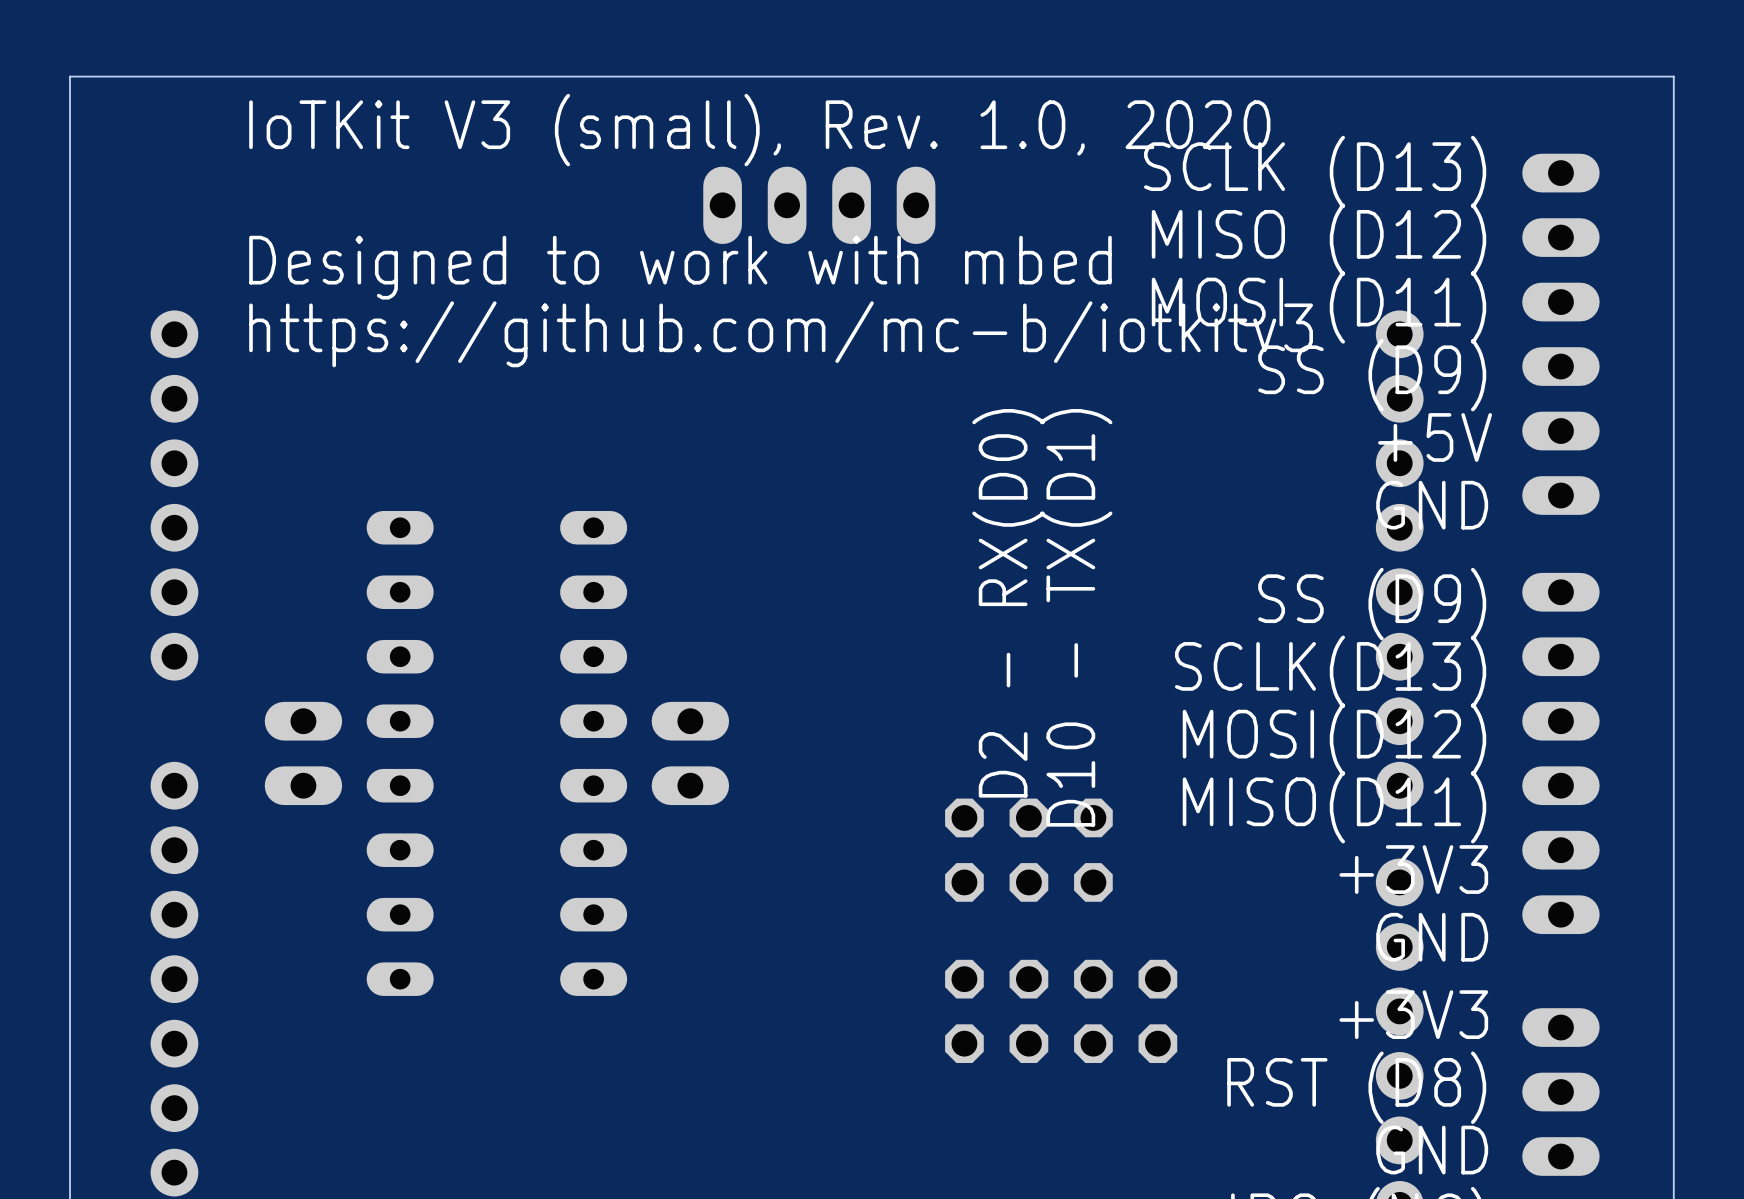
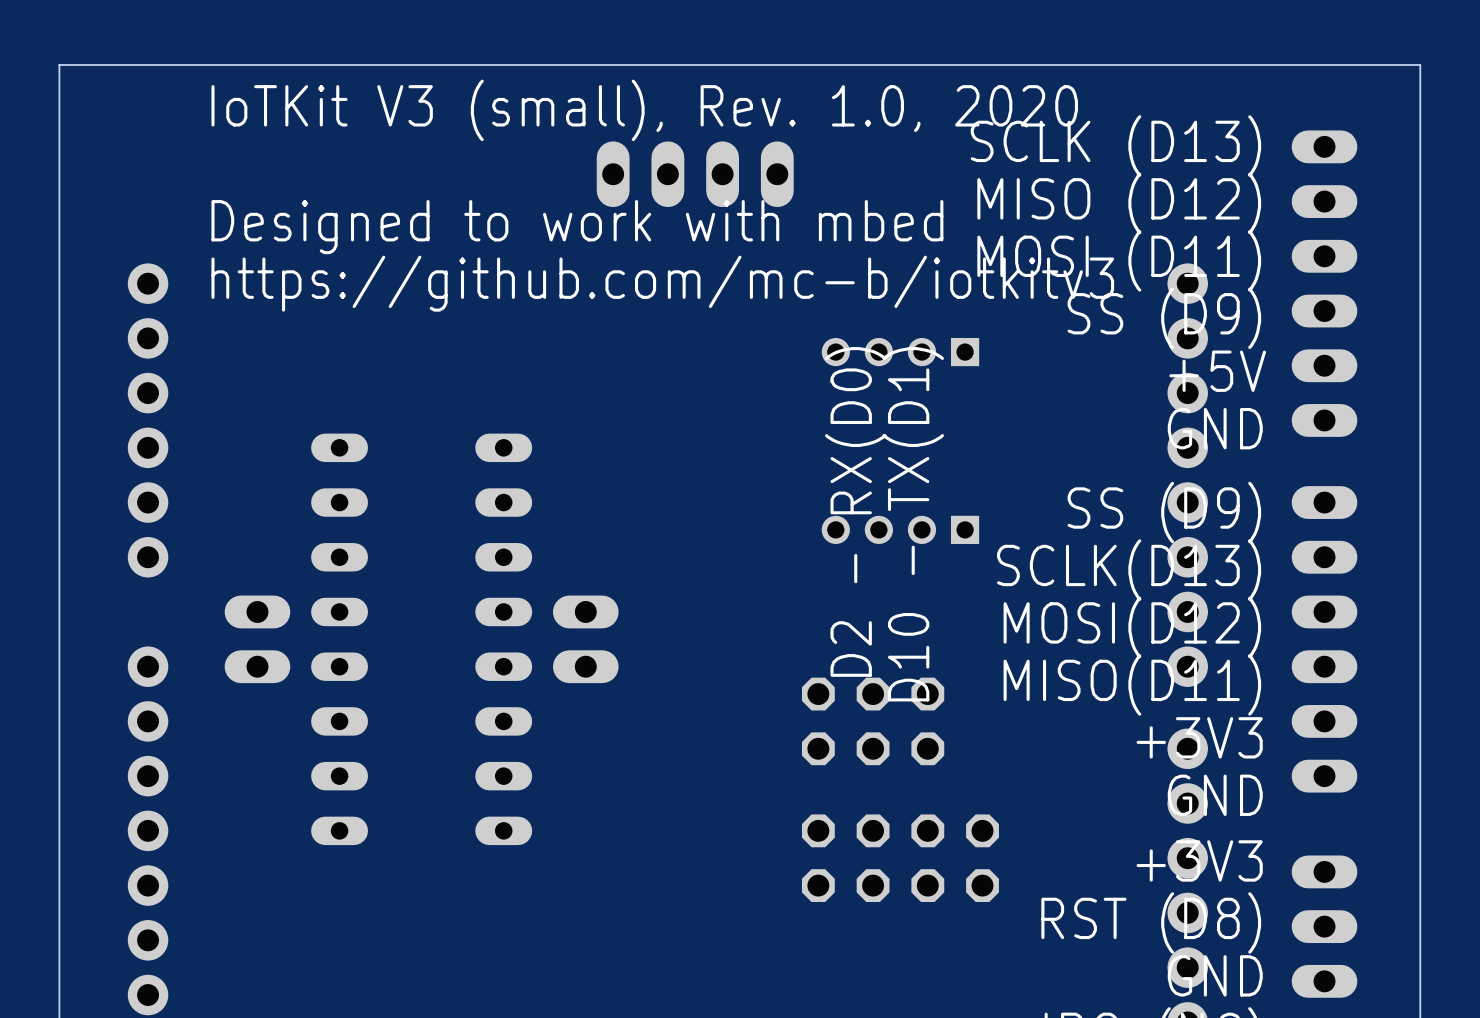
part: none -> (900, 352)
part: none -> (900, 529)

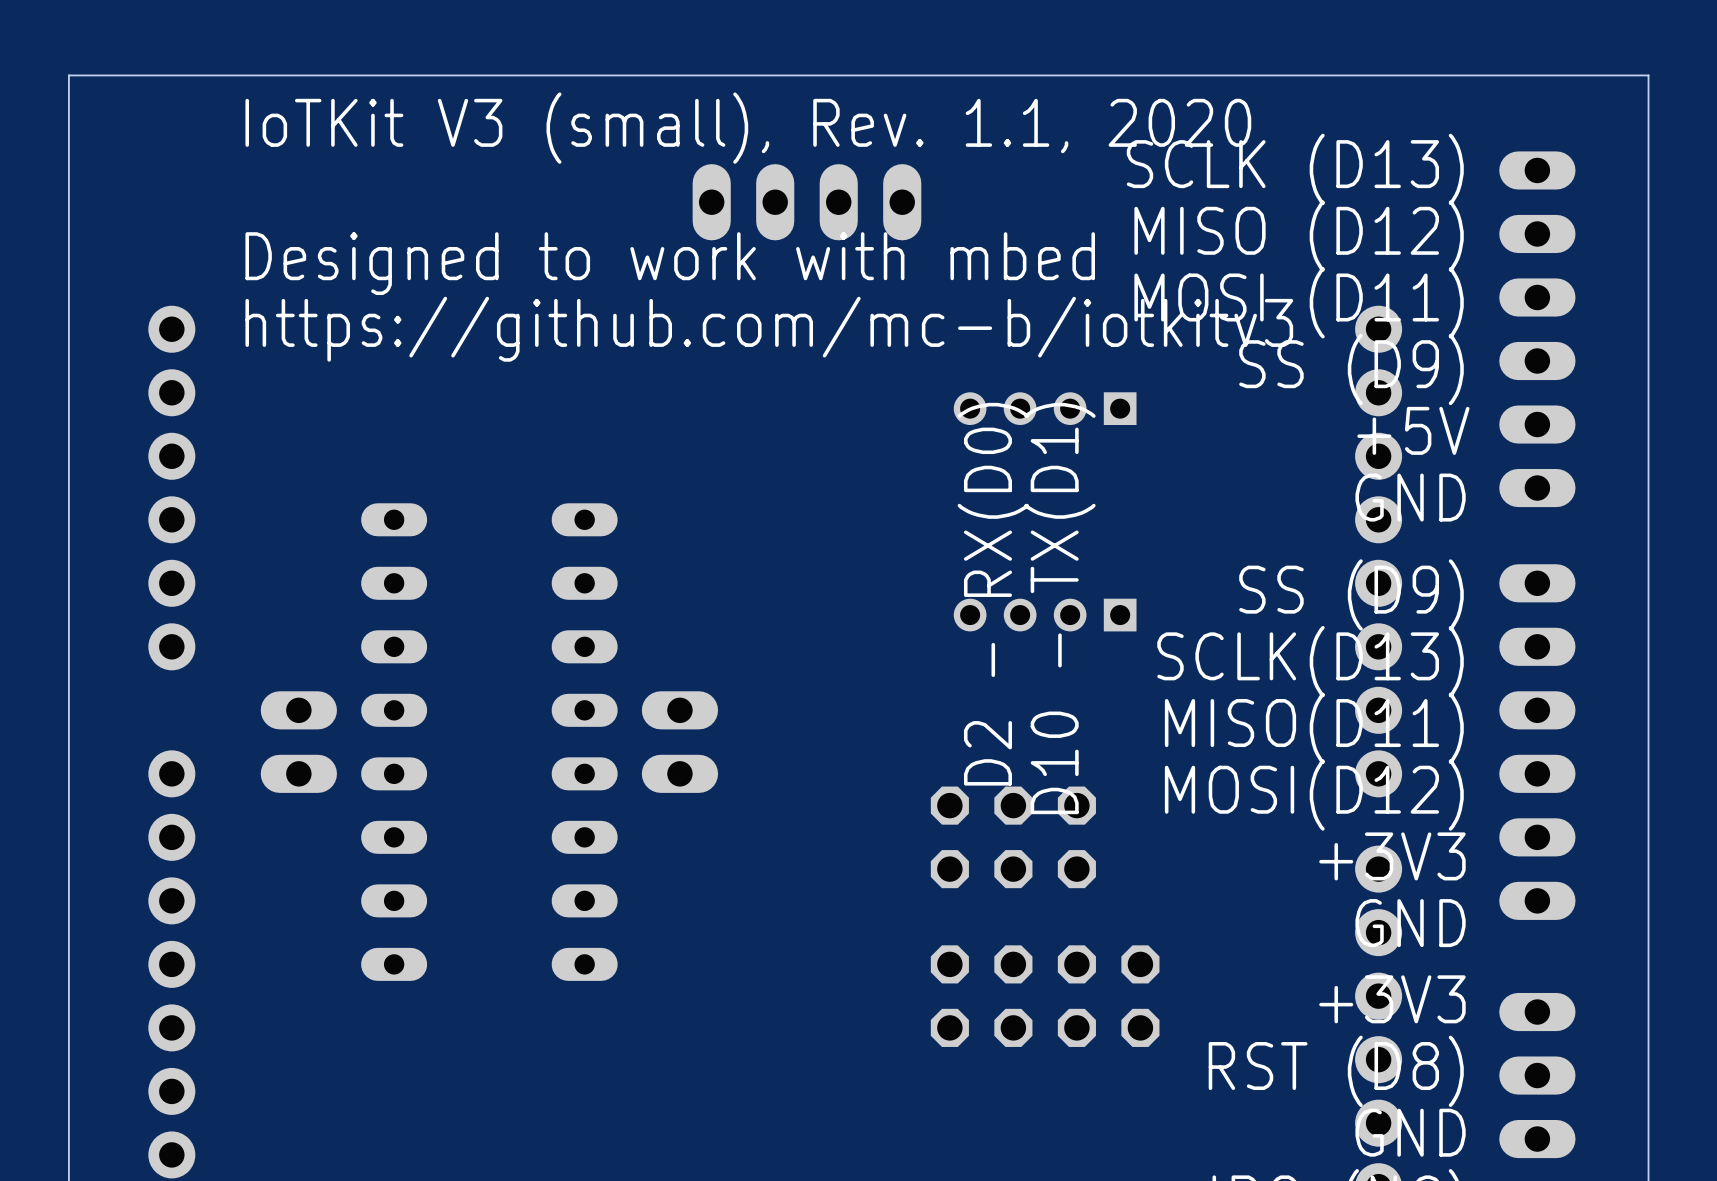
text: IoTKit V3 (small), Rev. 1.0, 2020 (644, 110) -> IoTKit V3 (small), Rev. 1.1, 2020 (748, 128)
text: MOSI(D12) (1132, 627) -> MISO(D11) (1314, 728)
text: MISO(D11) (1132, 684) -> MOSI(D12) (1314, 795)

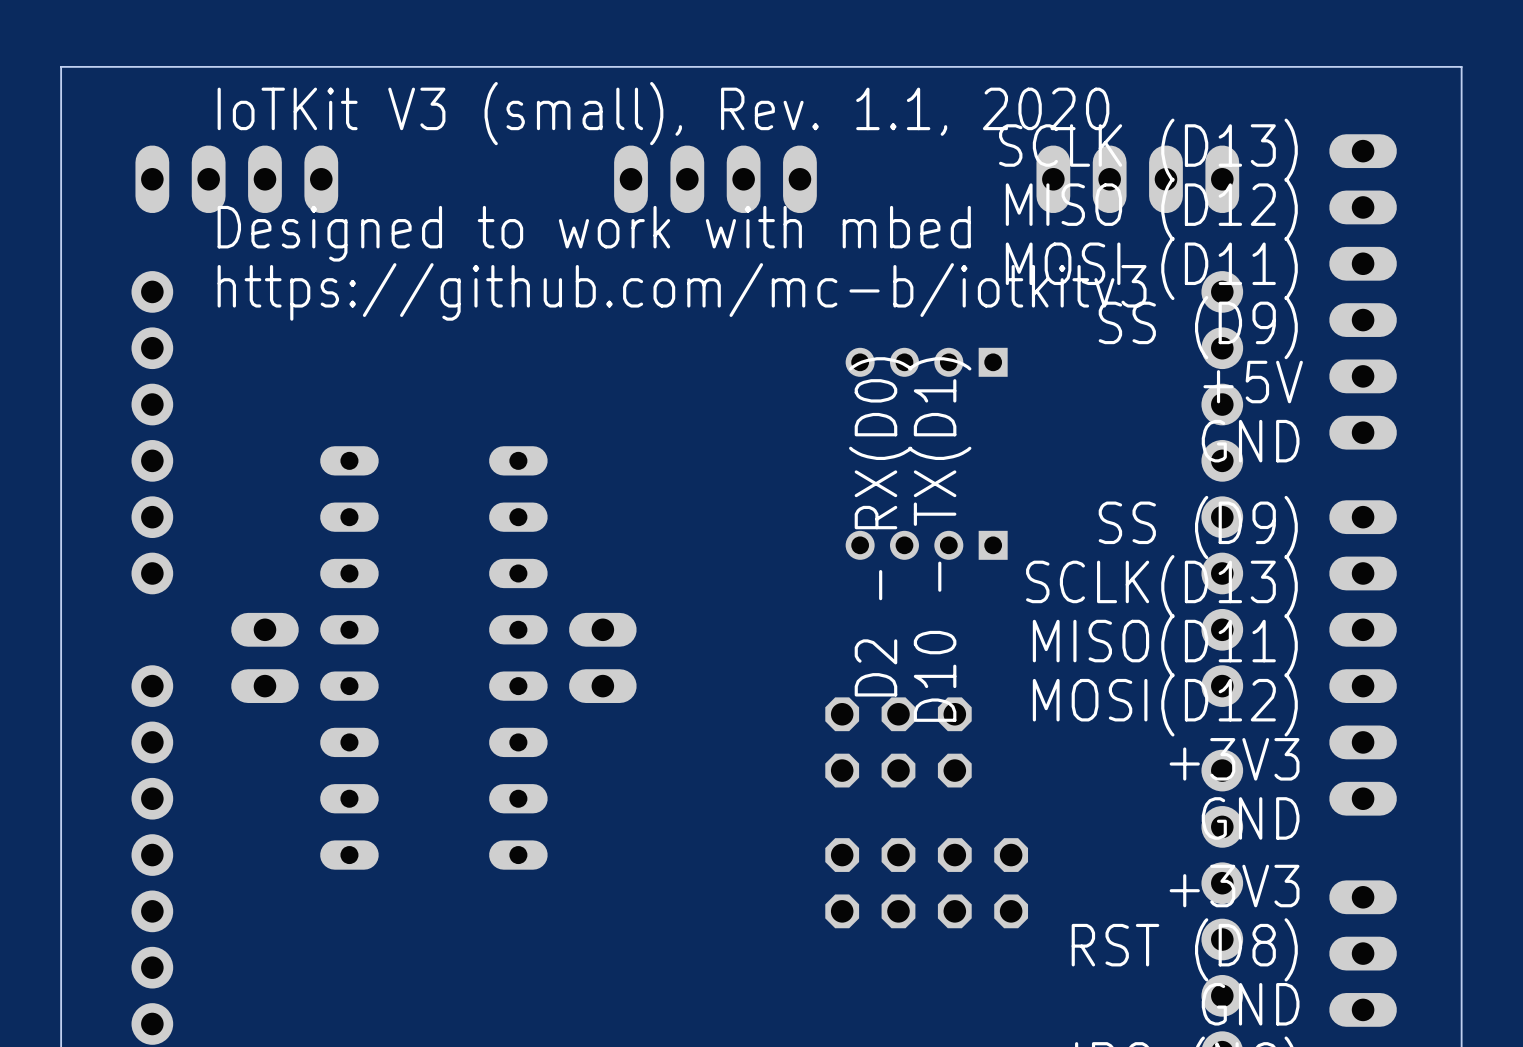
part: none -> (236, 179)
part: none -> (1137, 179)

